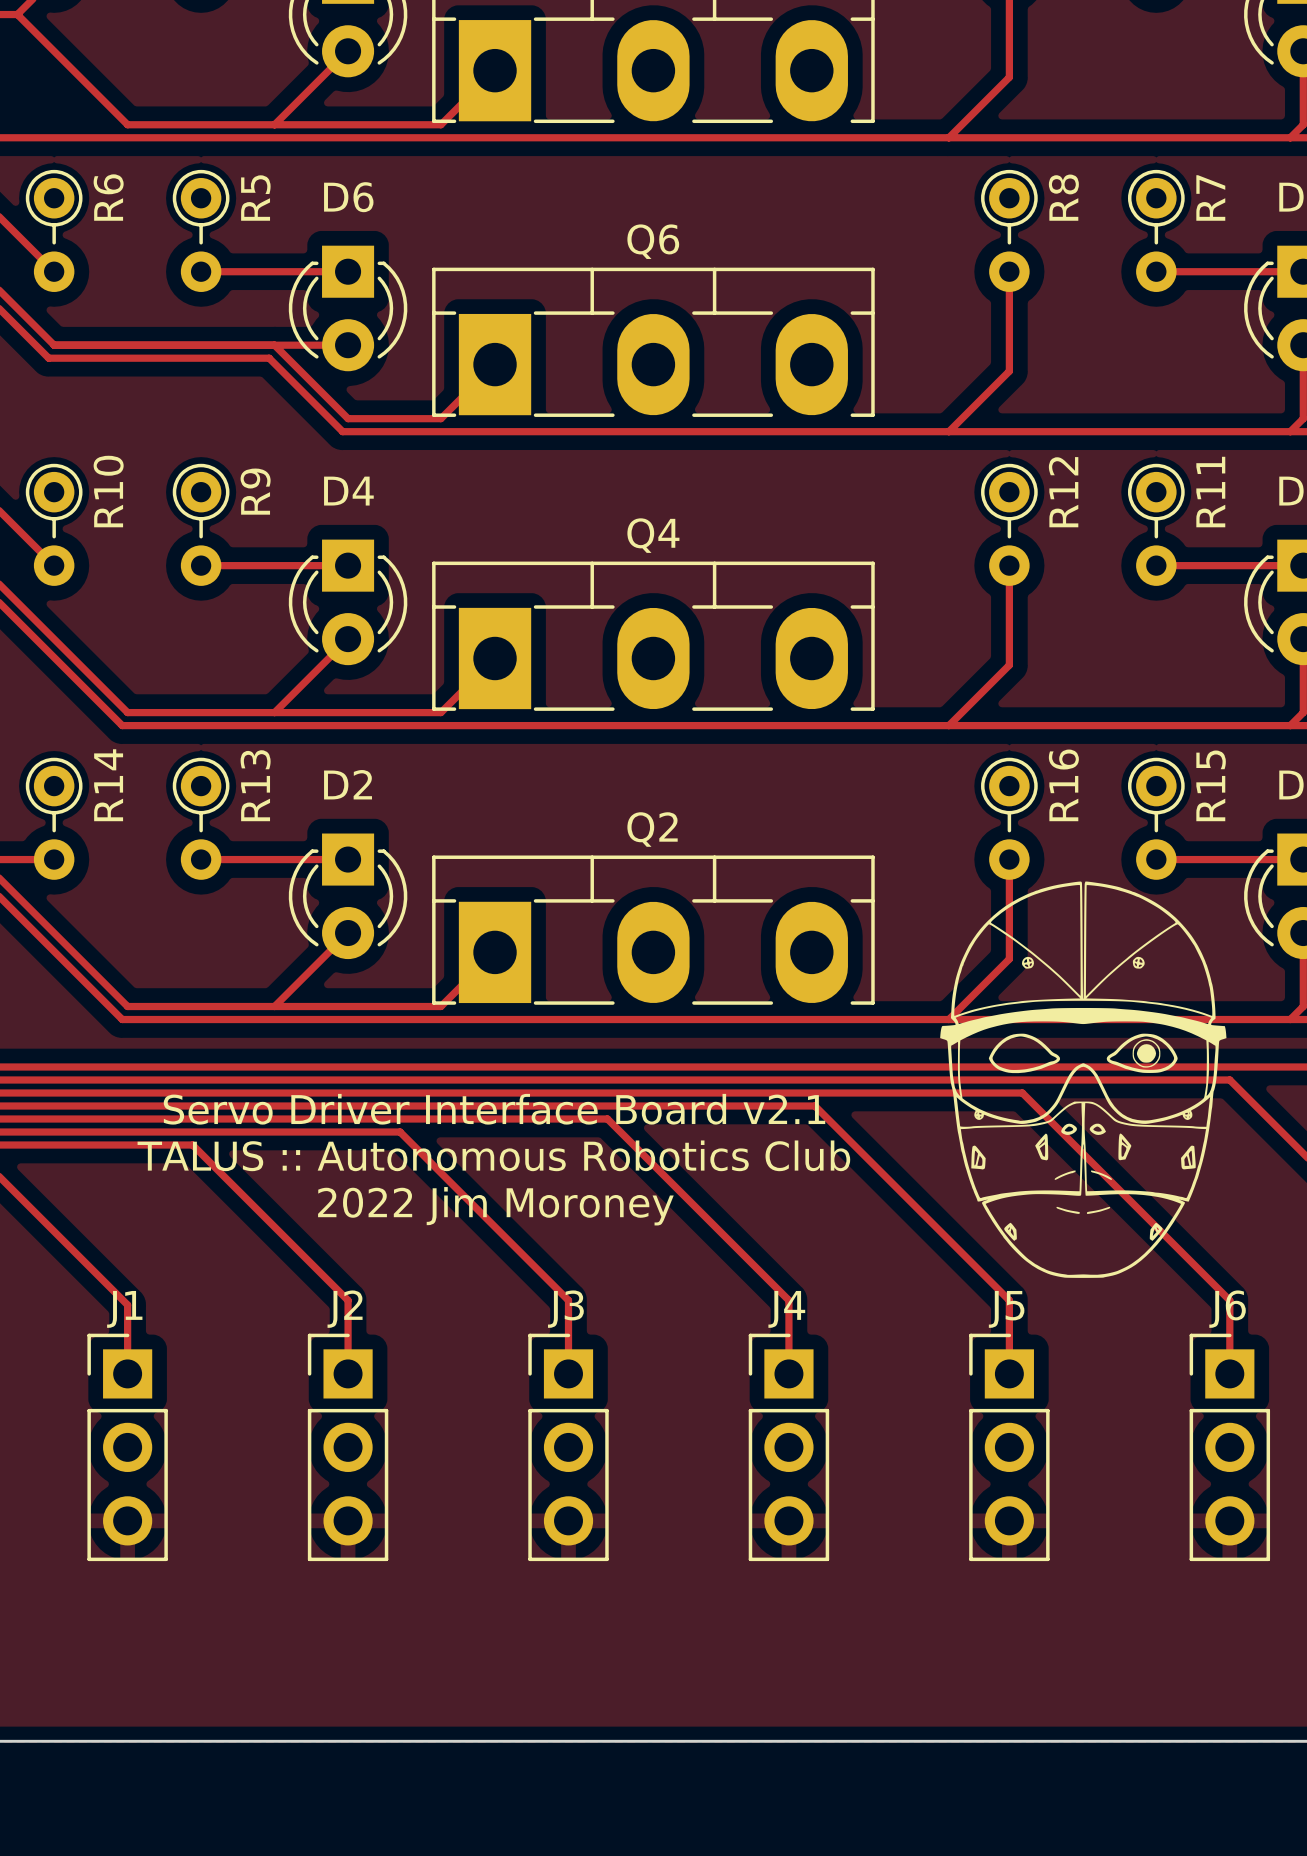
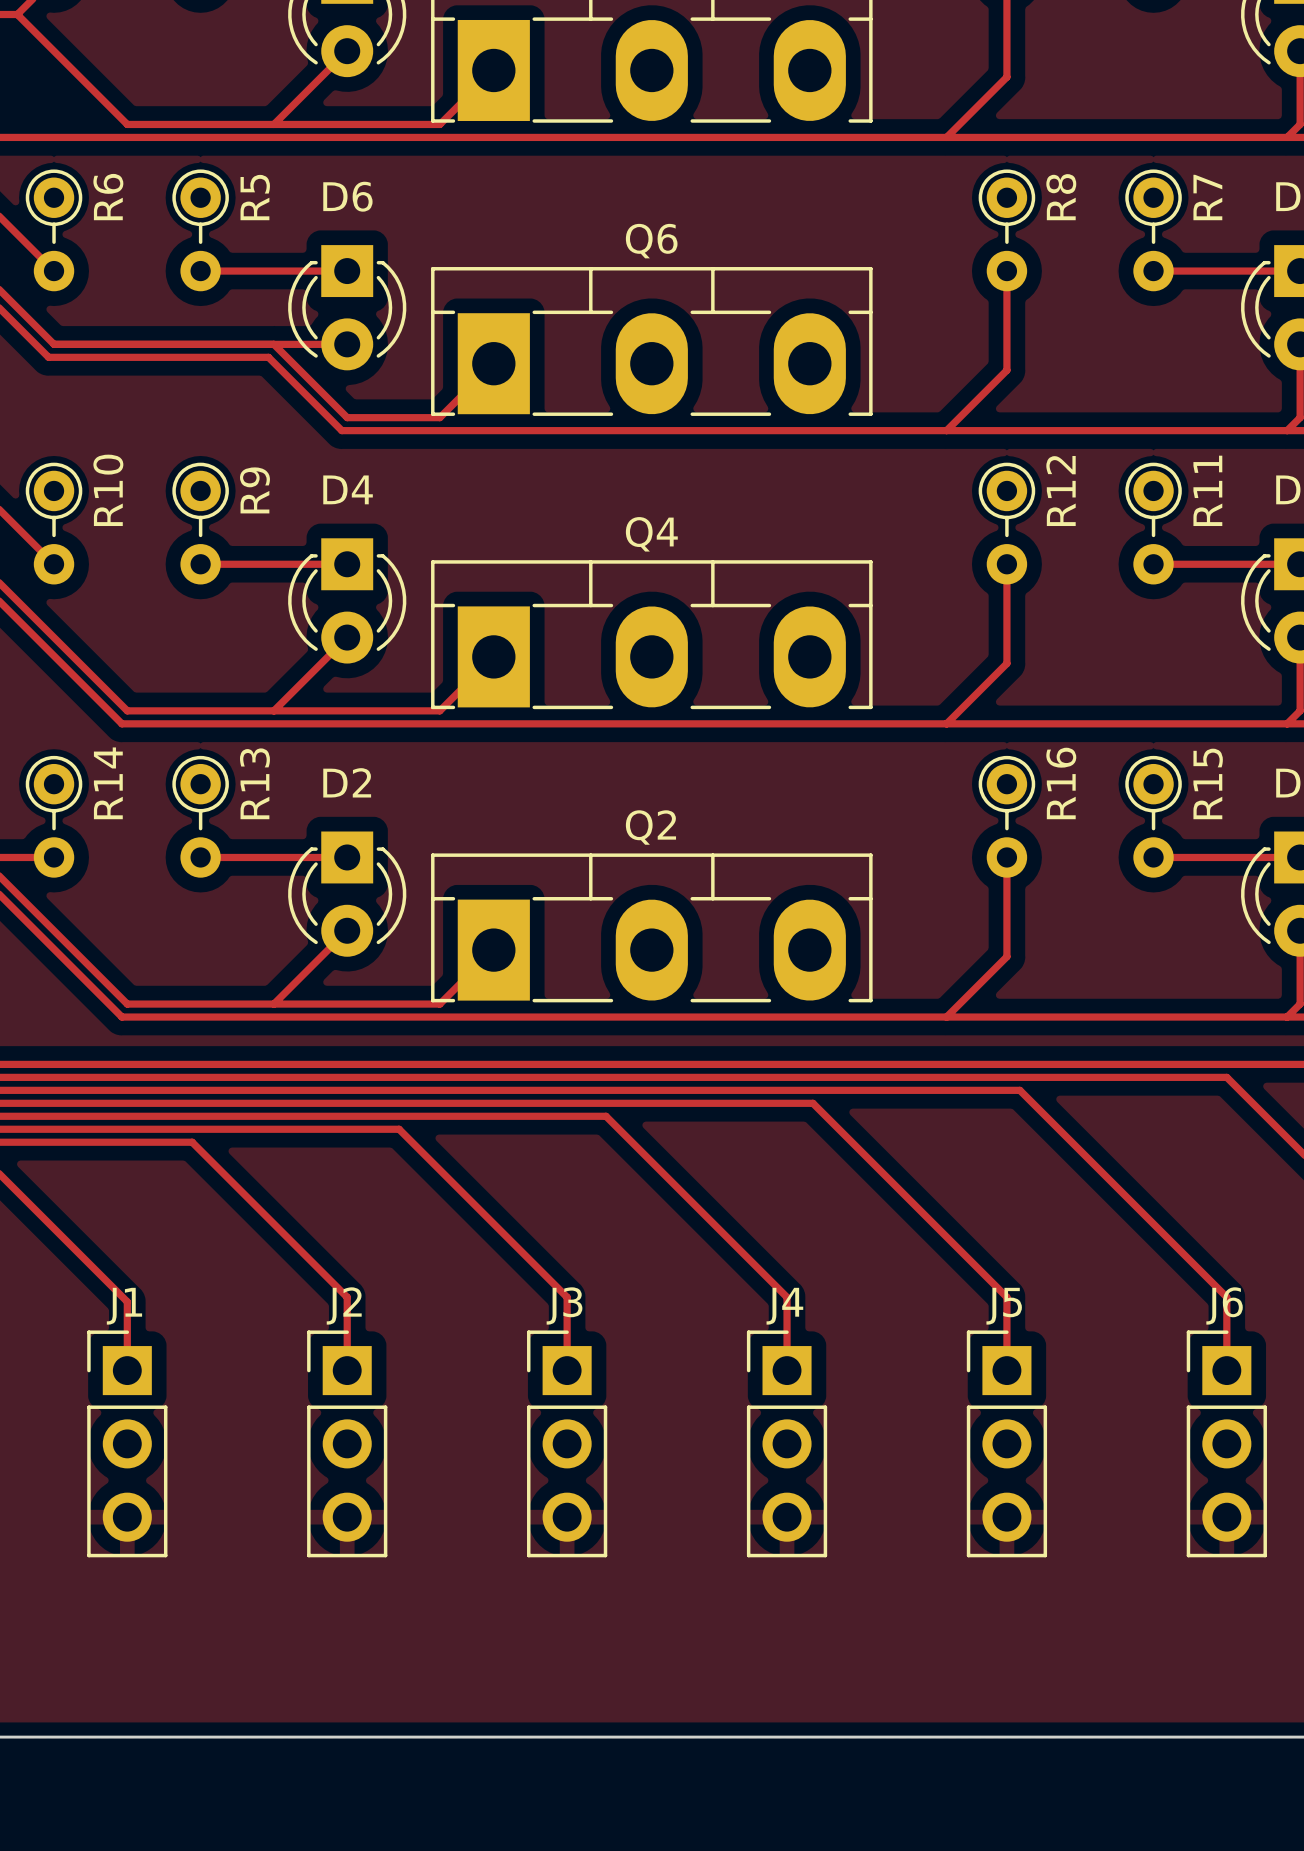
drawing: [940, 881, 1227, 1278] -> none
text: Servo Driver Interface Board v2.1 (494, 1109) -> none
text: TALUS :: Autonomous Robotics Club (493, 1155) -> none
text: 2022 Jim Moroney (495, 1206) -> none

